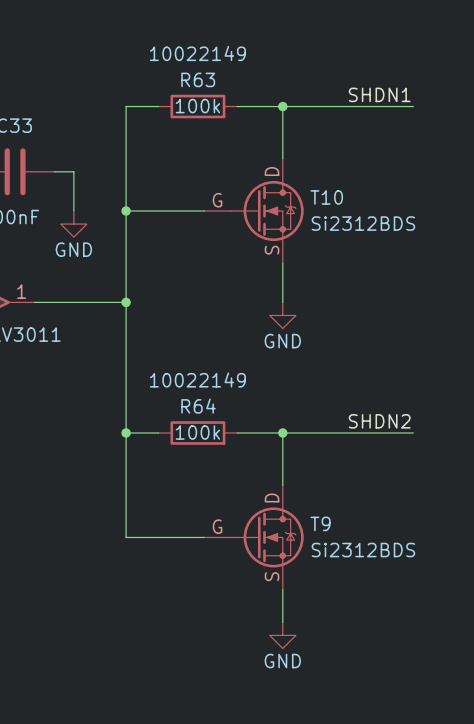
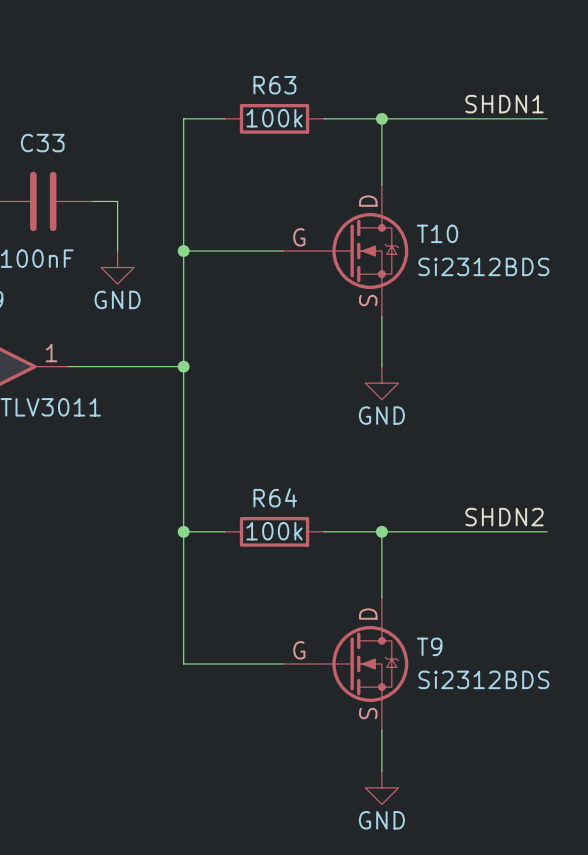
R63 text: 10022149 (197, 53) -> none
R64 text: 10022149 (197, 379) -> none

